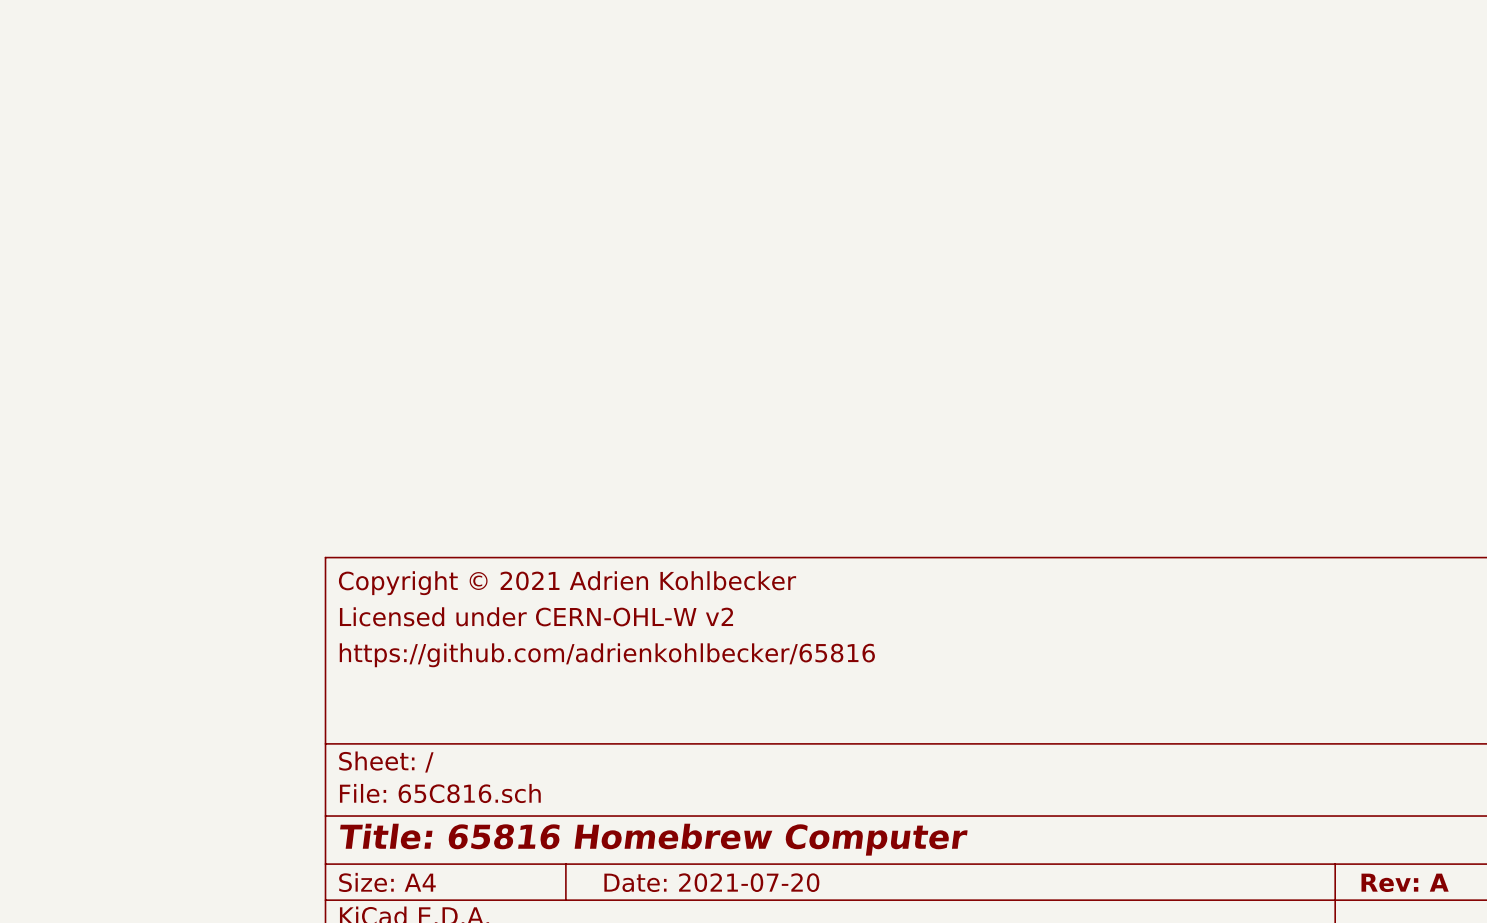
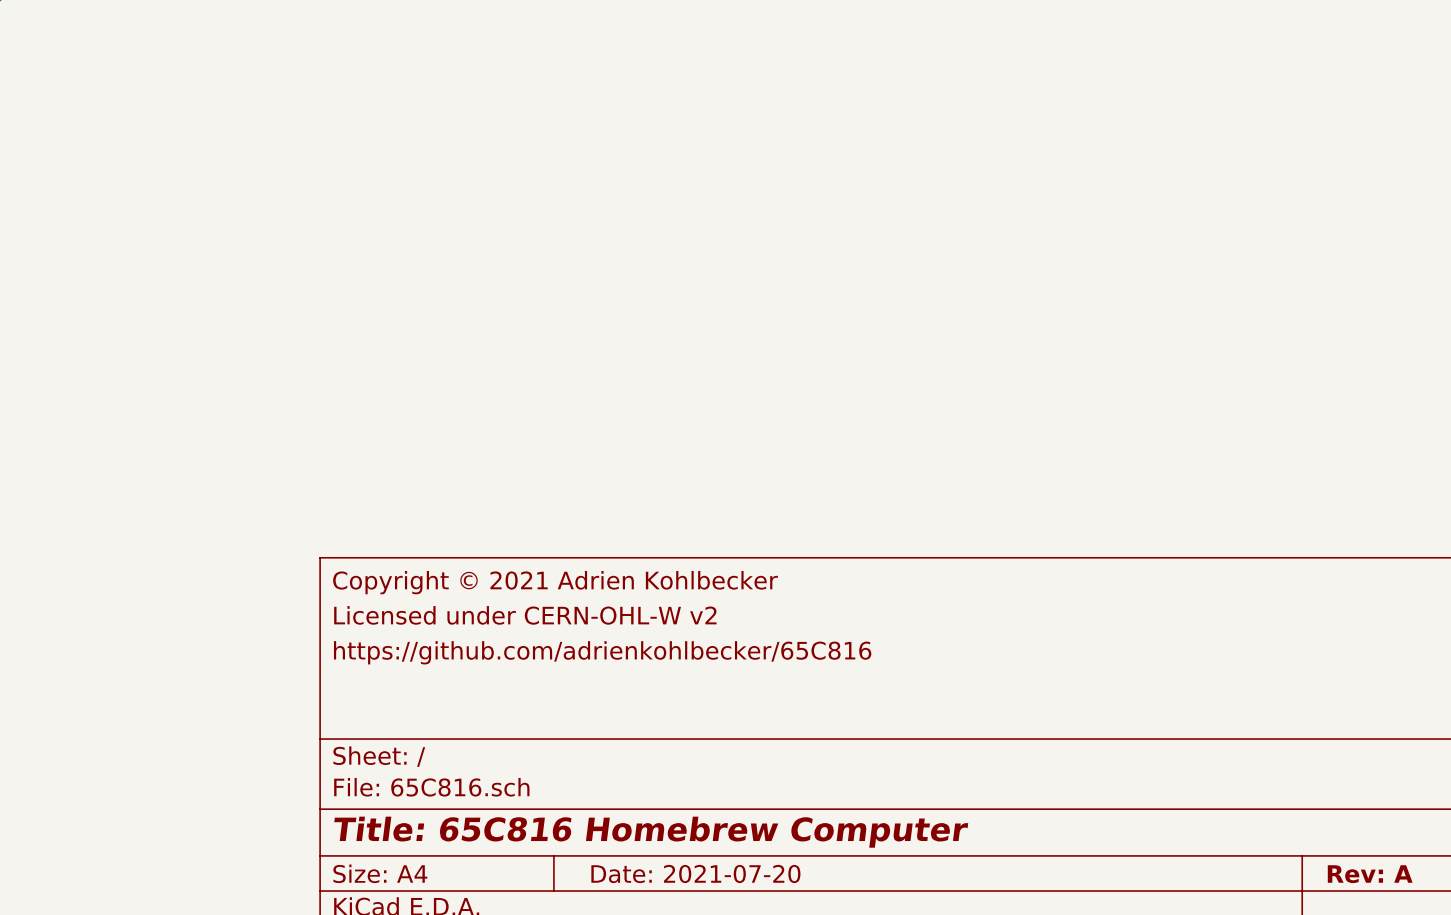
title block: https://github.com/adrienkohlbecker/65816 (607, 655) -> https://github.com/adrienkohlbecker/65C816 (602, 652)
title block: Title: 65816 Homebrew Computer (653, 839) -> Title: 65C816 Homebrew Computer (651, 832)

